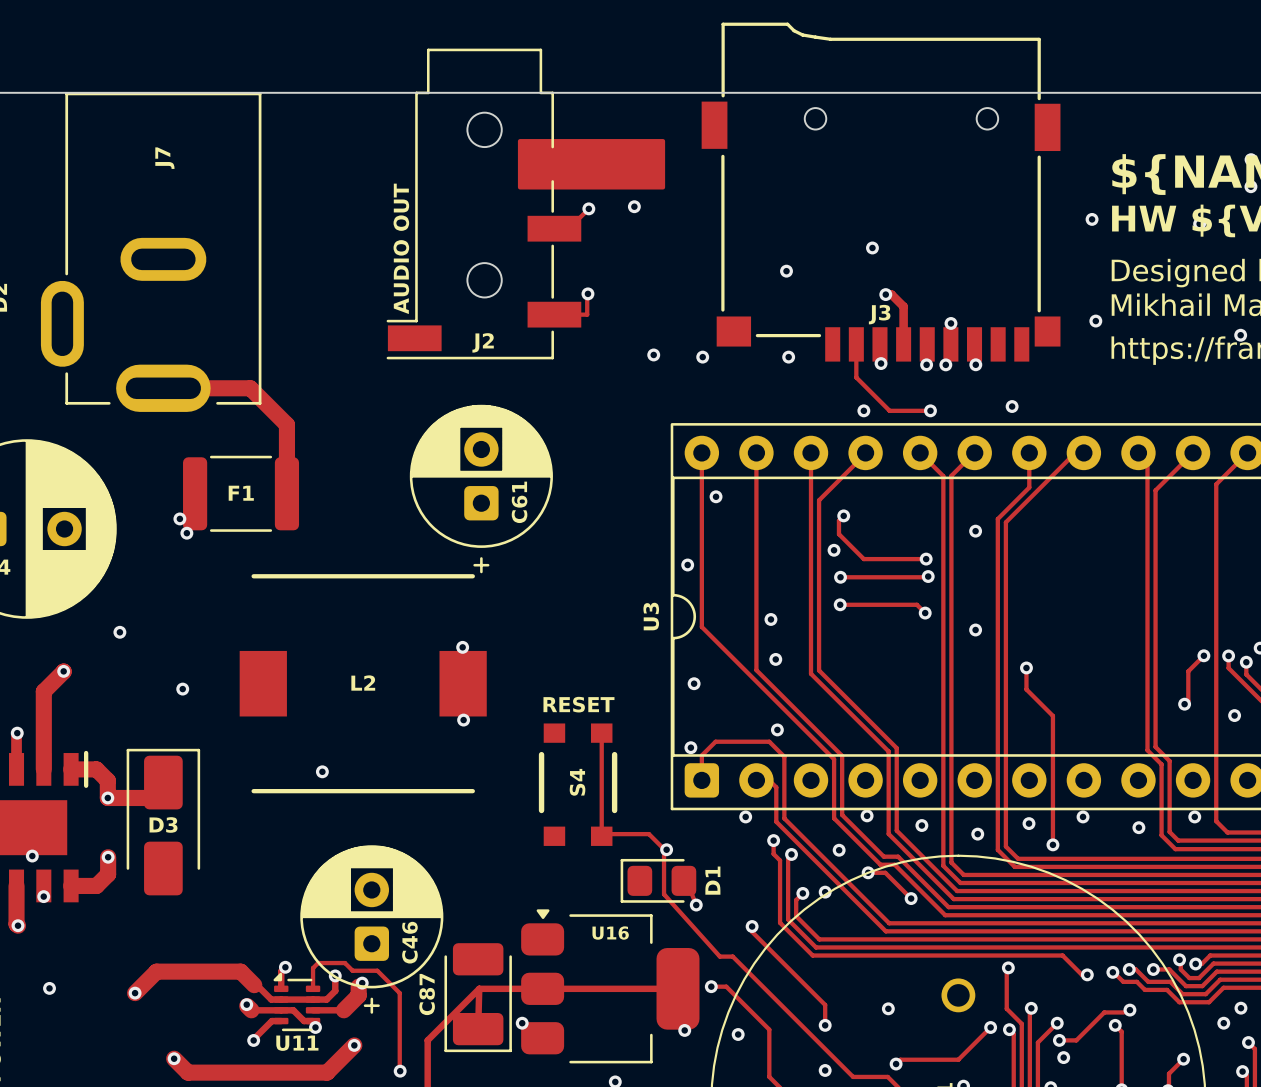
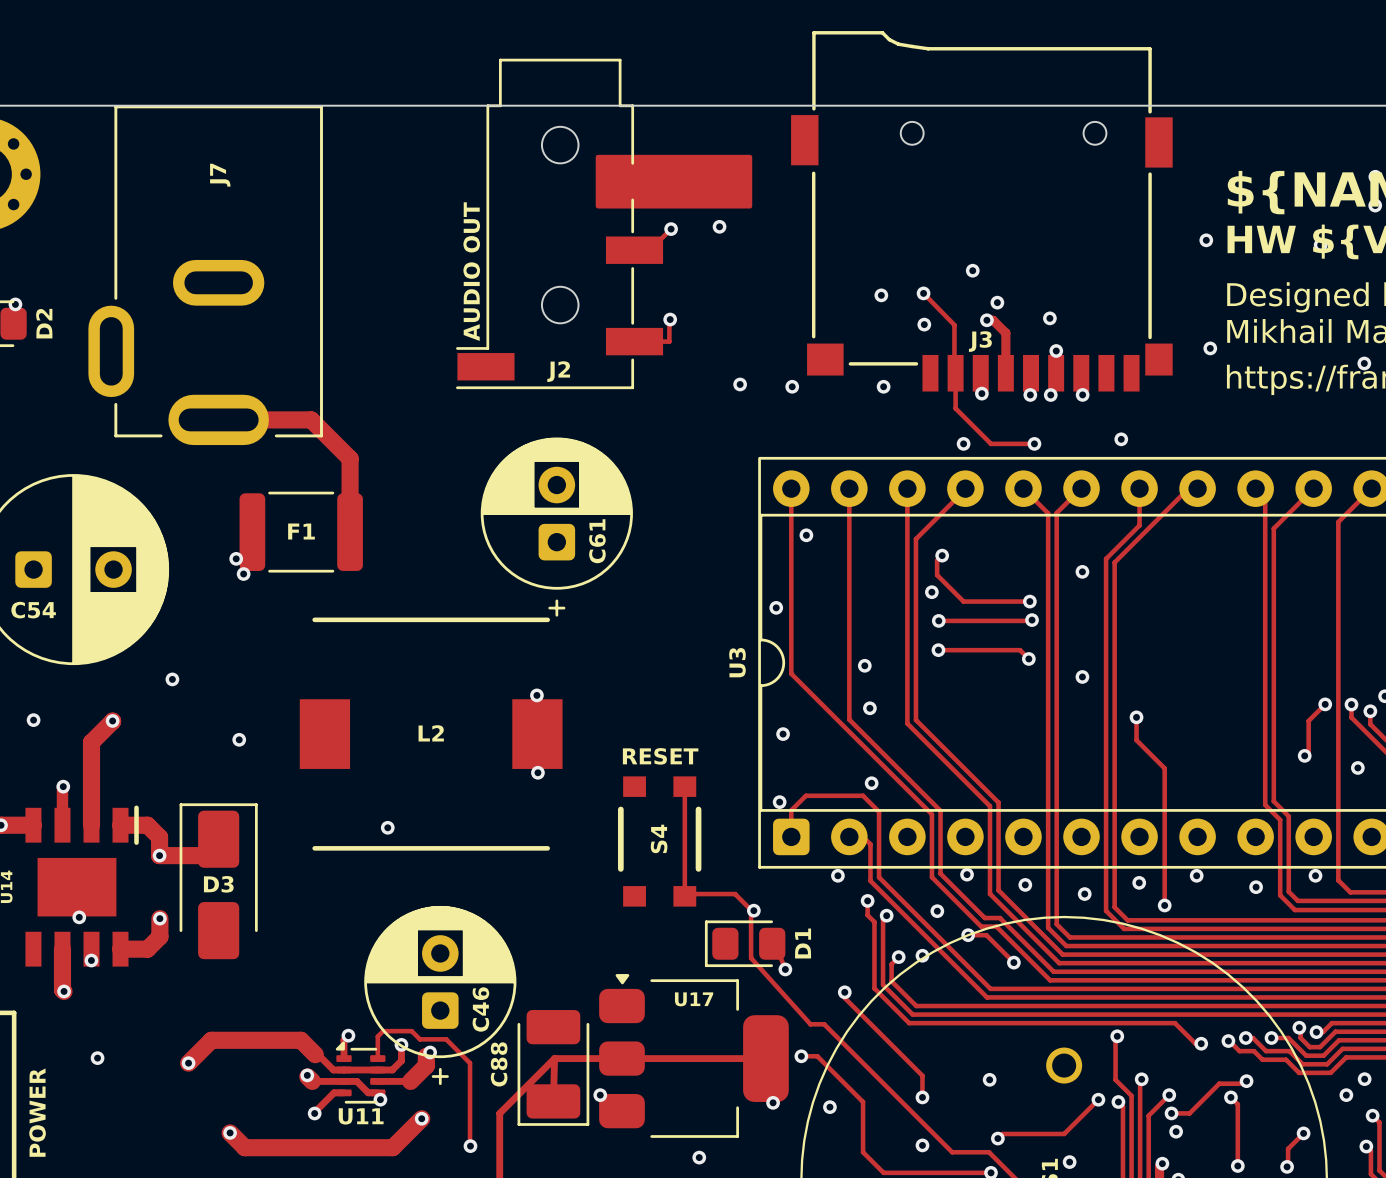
track: none -> (923, 293) (954, 325) (954, 354)
via: none -> (923, 293)
via: none -> (997, 302)
via: none -> (1049, 318)
via: none -> (924, 324)
U16 name: U16 (610, 933) -> U17 (694, 999)
C87 name: C87 (427, 994) -> C88 (499, 1064)

